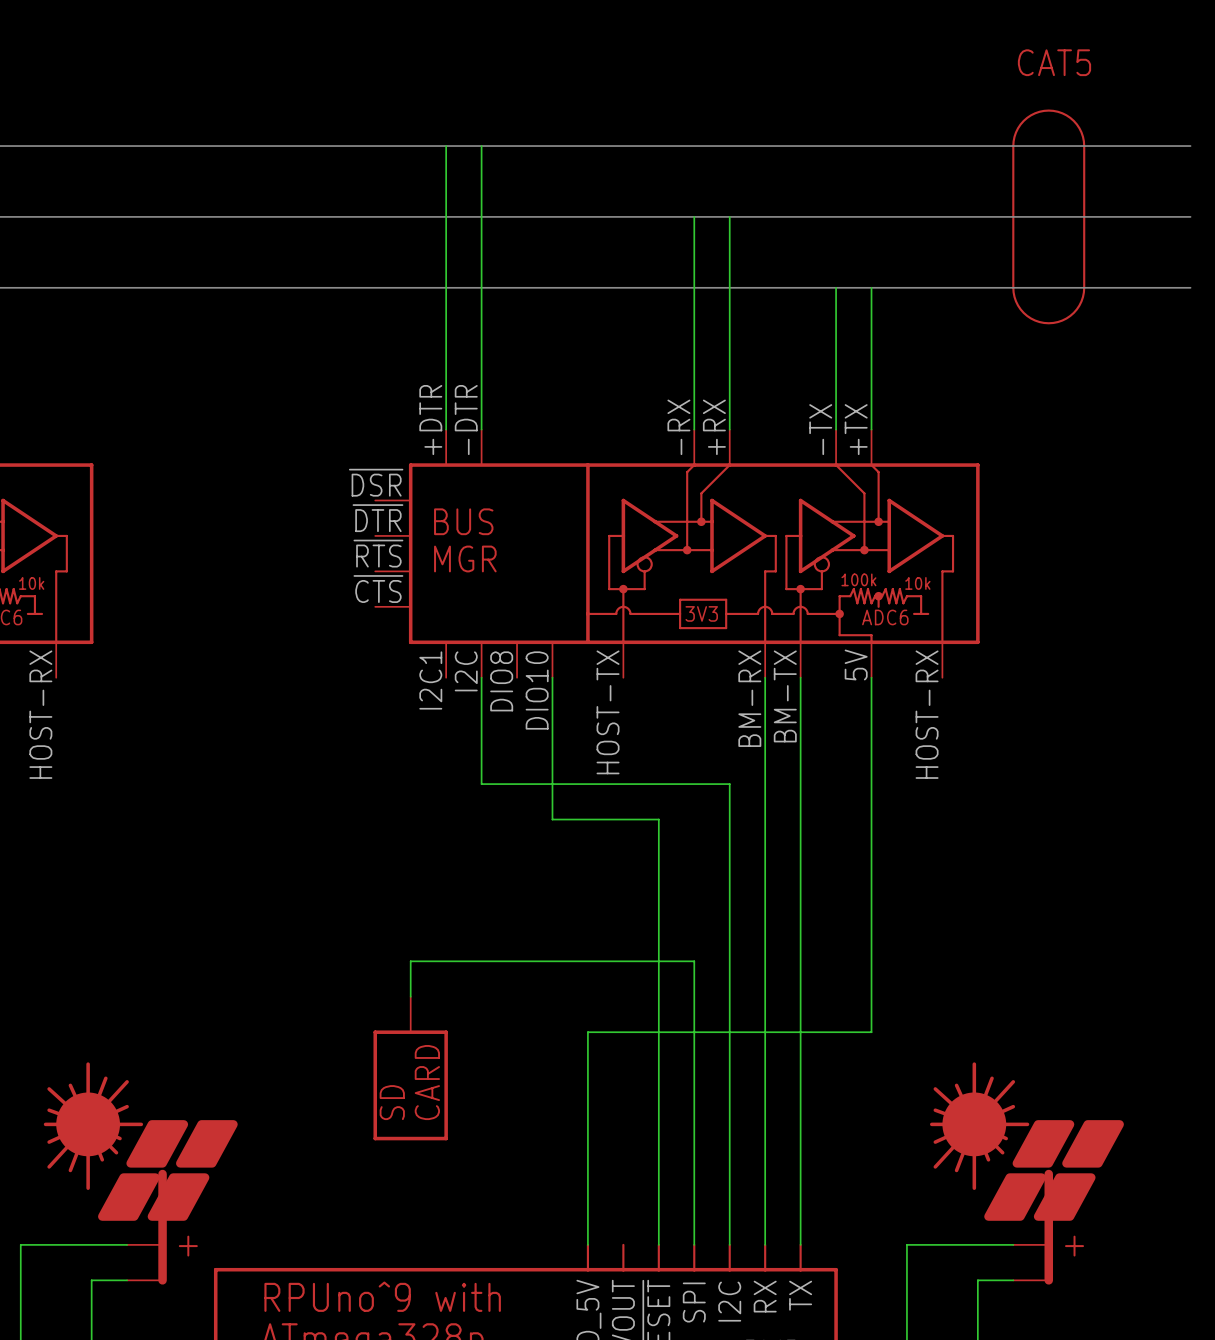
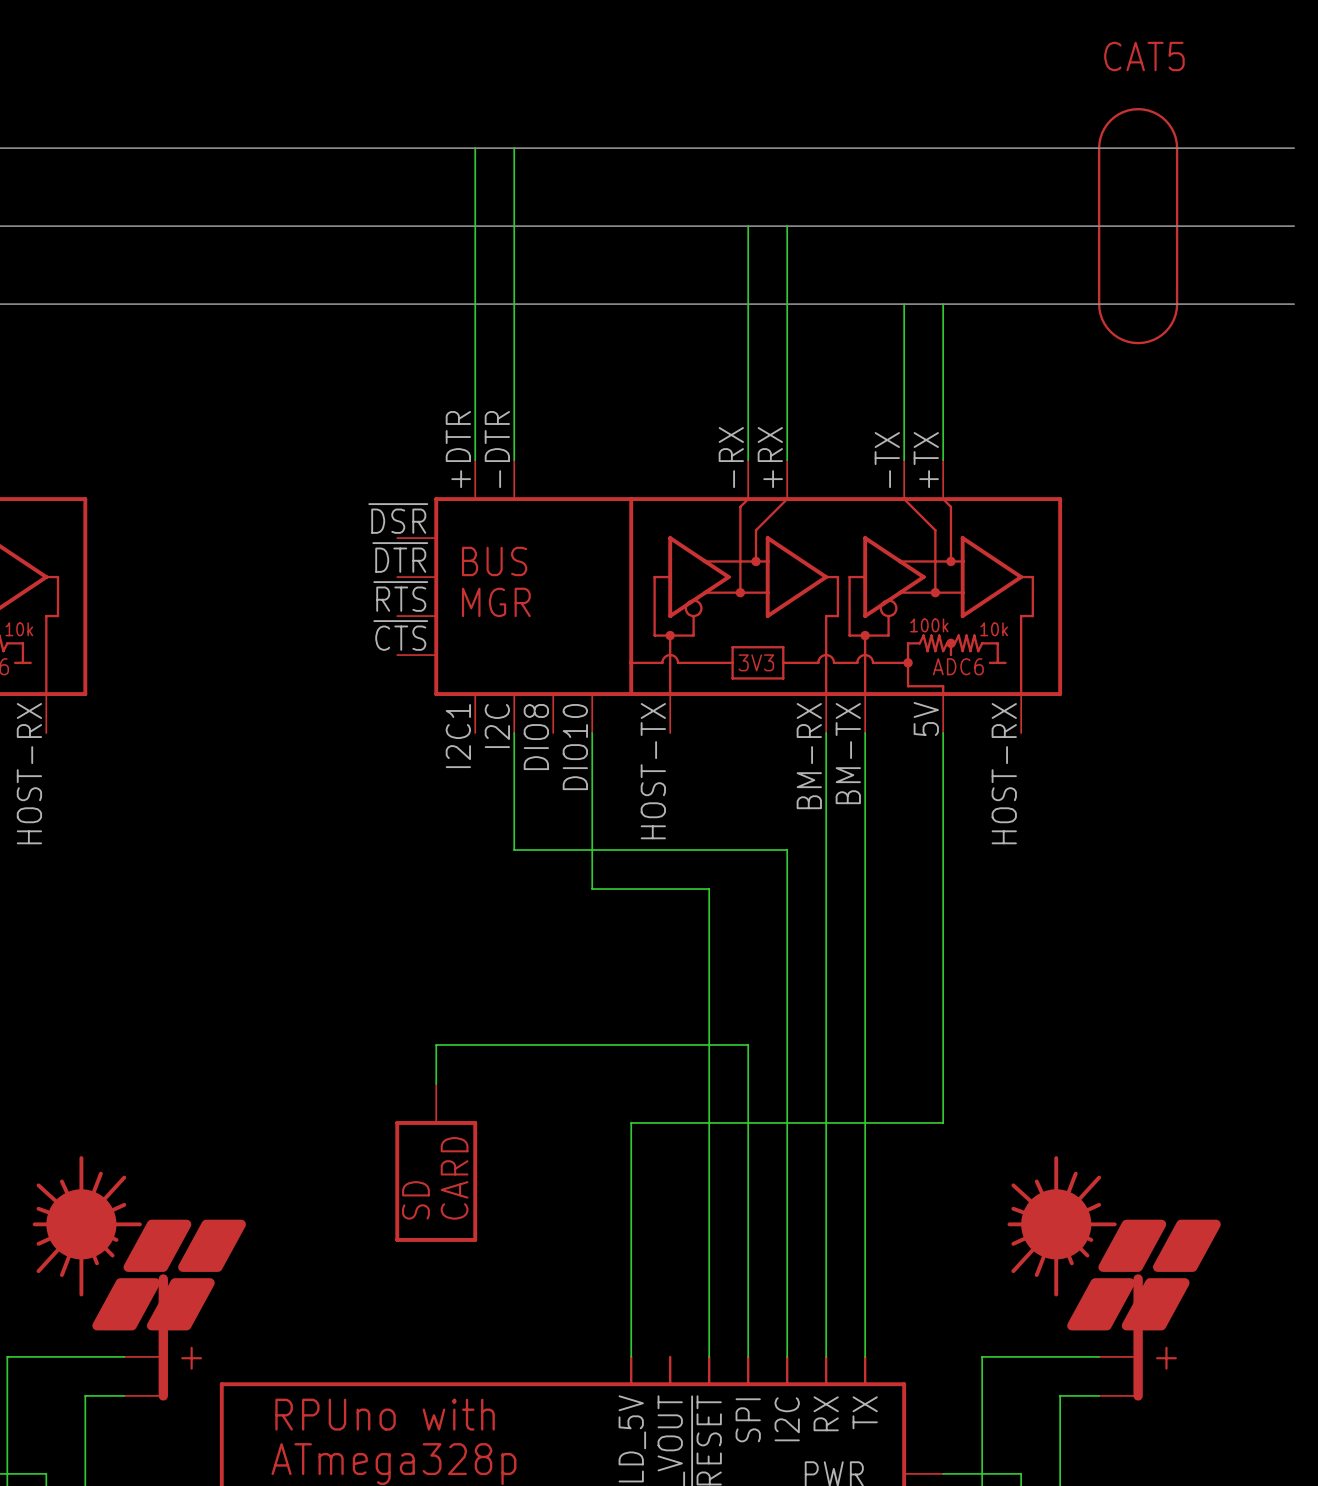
part text: RPUno^9 with (382, 1296) -> RPUno with (385, 1414)

